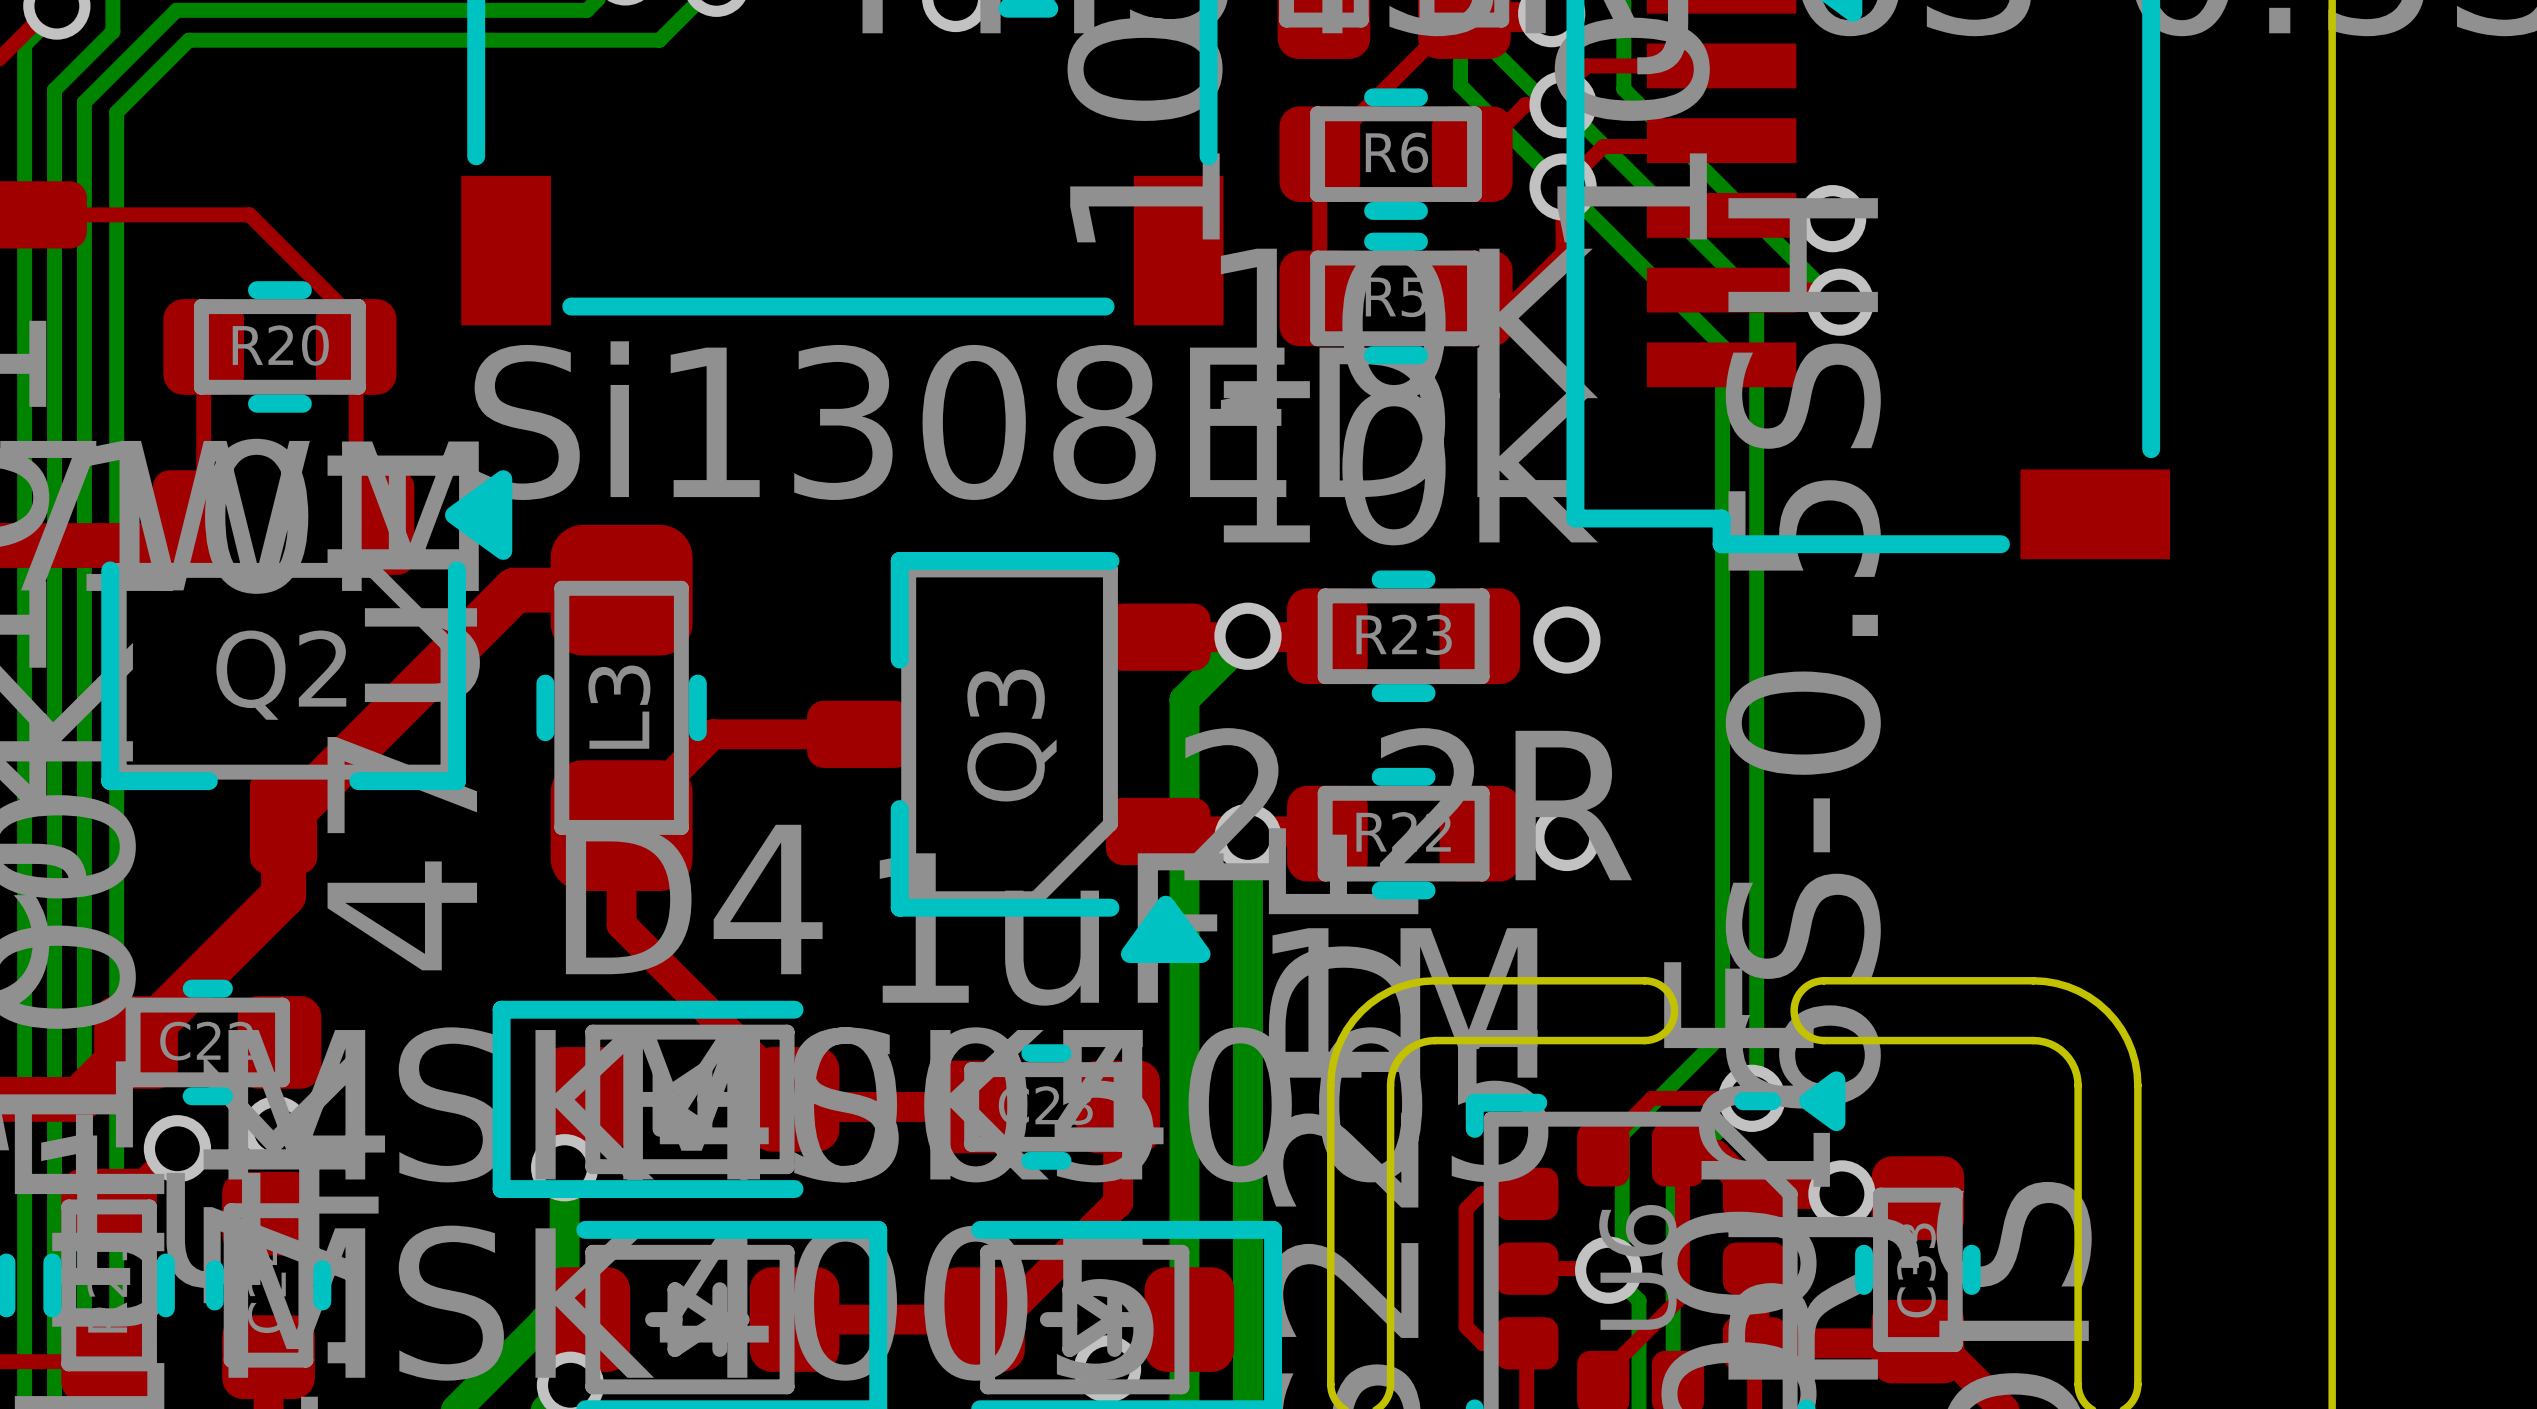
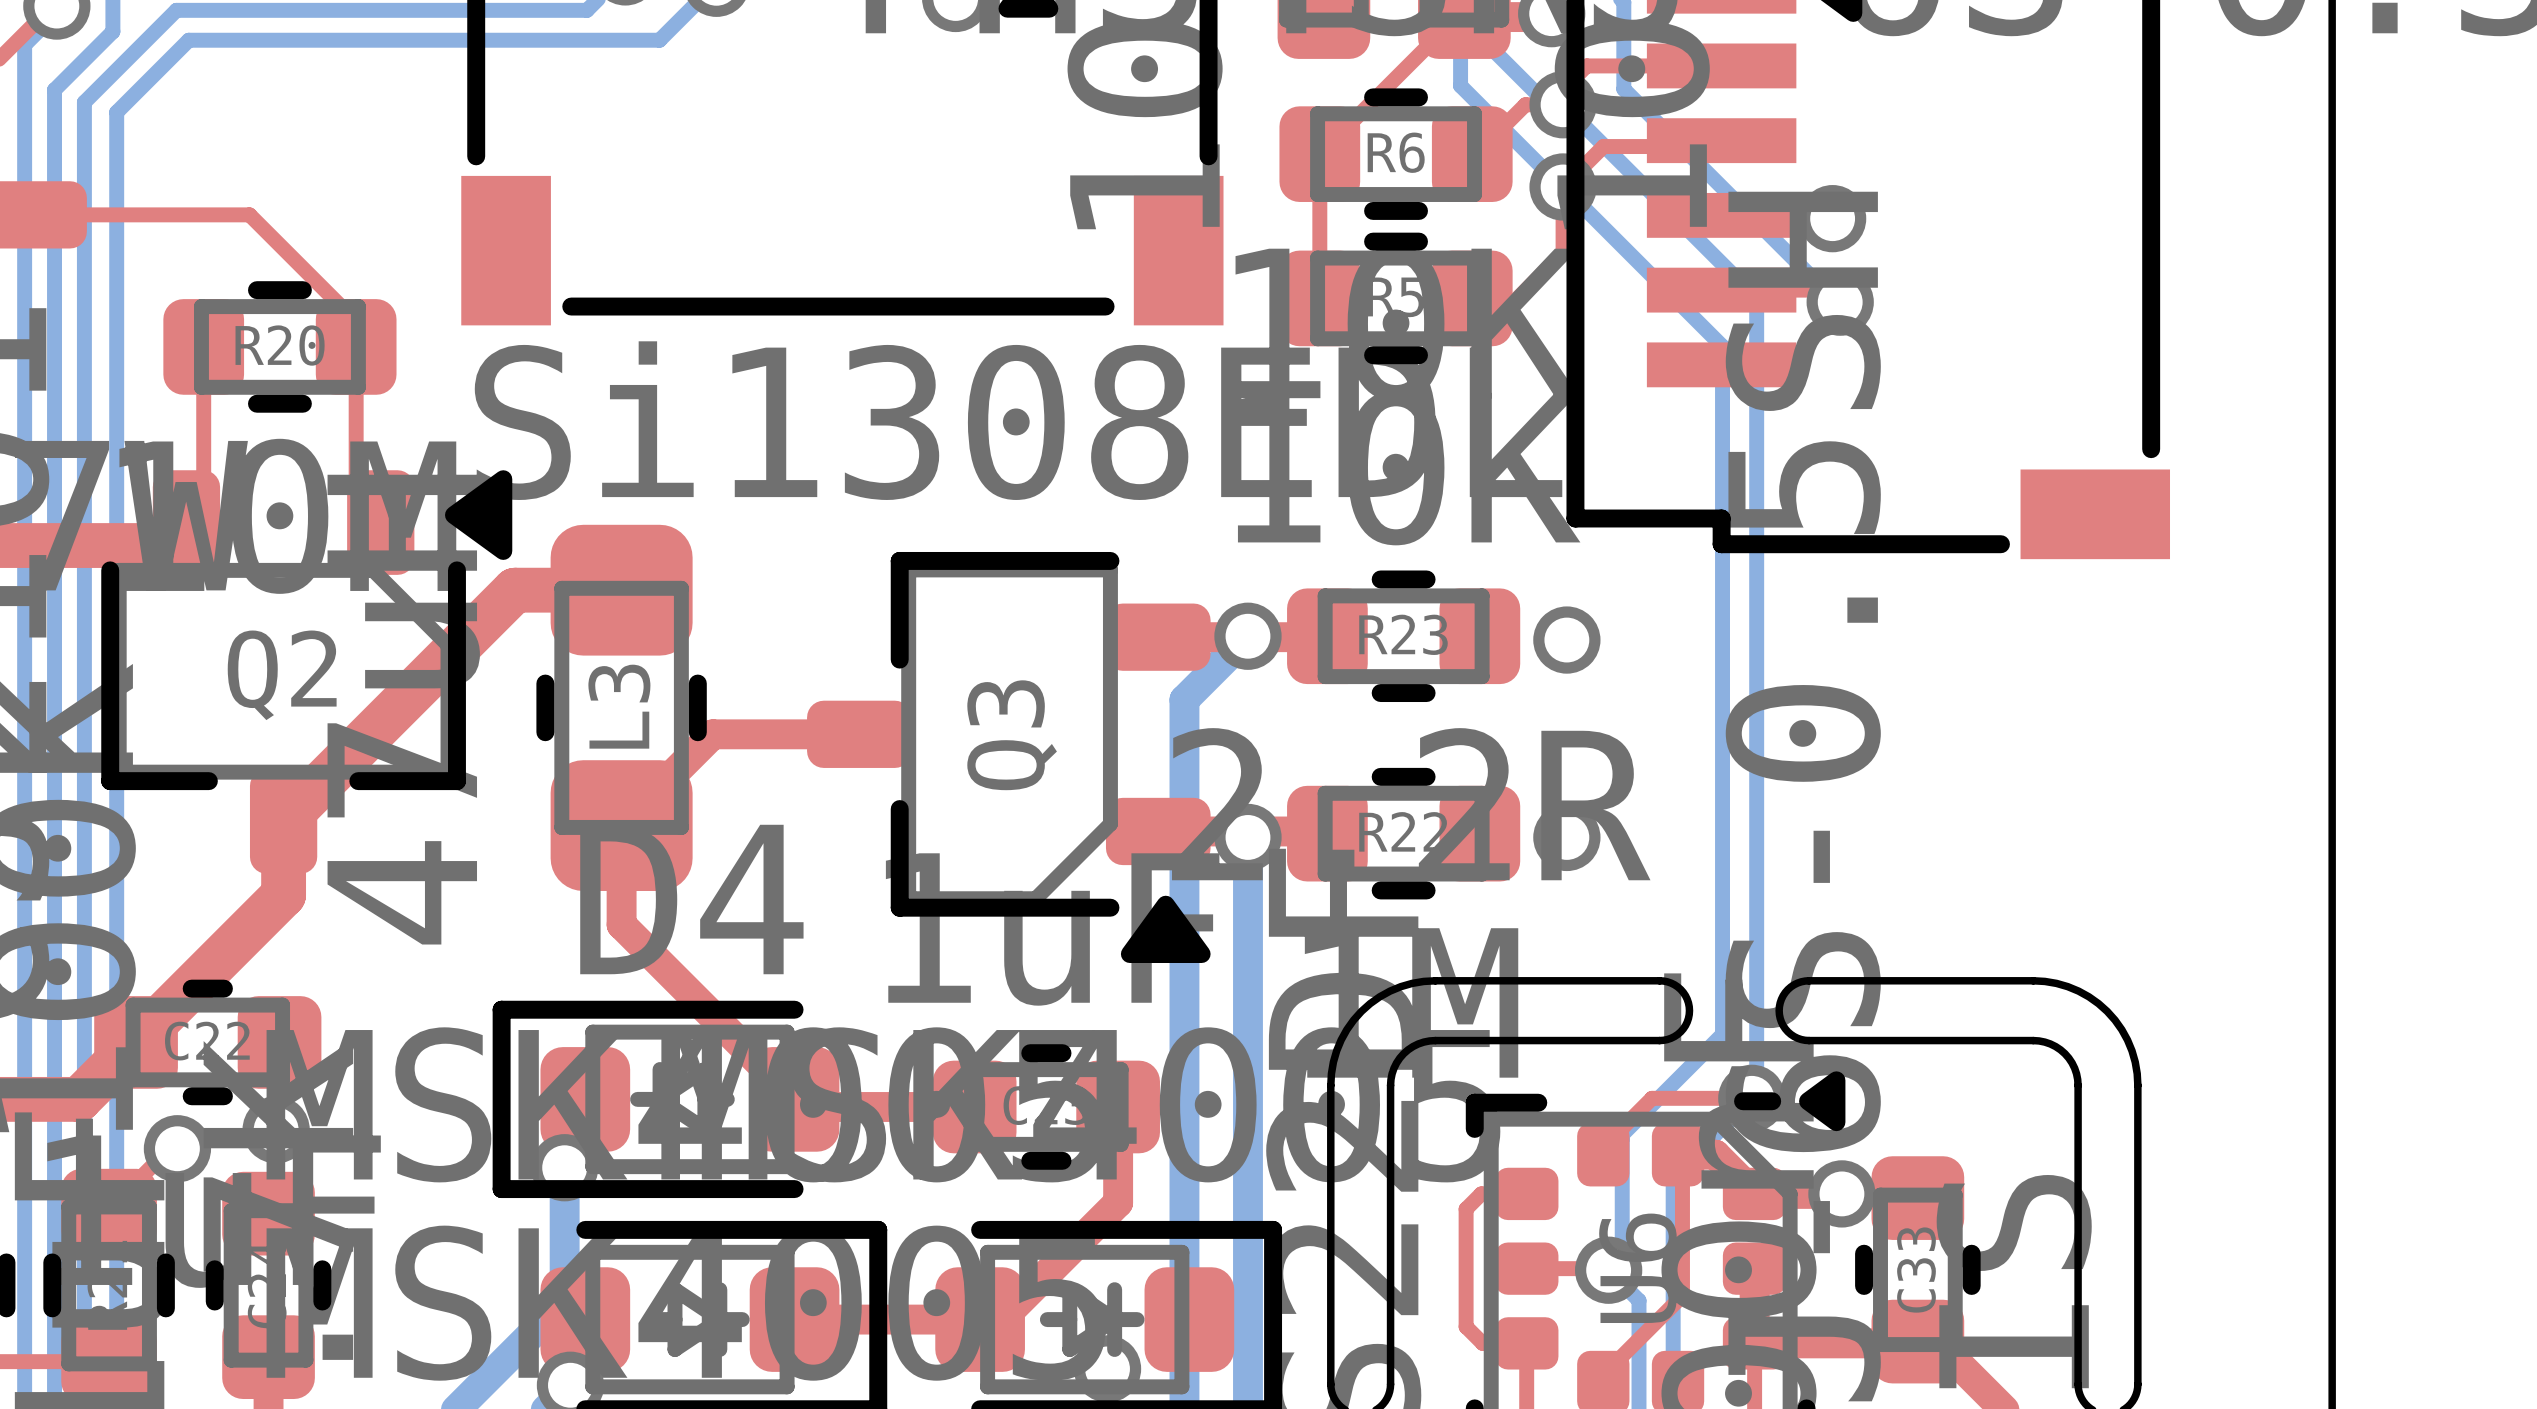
board edge: (1644, 980) (1656, 983) (1665, 989) (1672, 999) (1674, 1010) (1672, 1022) (1665, 1031) (1656, 1038) (1644, 1040) -> (1644, 980) (1663, 981) (1674, 984) (1685, 995) (1689, 1010) (1685, 1025) (1674, 1036) (1663, 1040) (1644, 1040)
board edge: (1824, 980) (1813, 982) (1804, 988) (1796, 1000) (1794, 1010) (1796, 1021) (1801, 1030) (1810, 1037) (1824, 1040) -> (1824, 980) (1805, 981) (1794, 984) (1783, 995) (1779, 1010) (1783, 1025) (1794, 1036) (1805, 1040) (1824, 1040)

